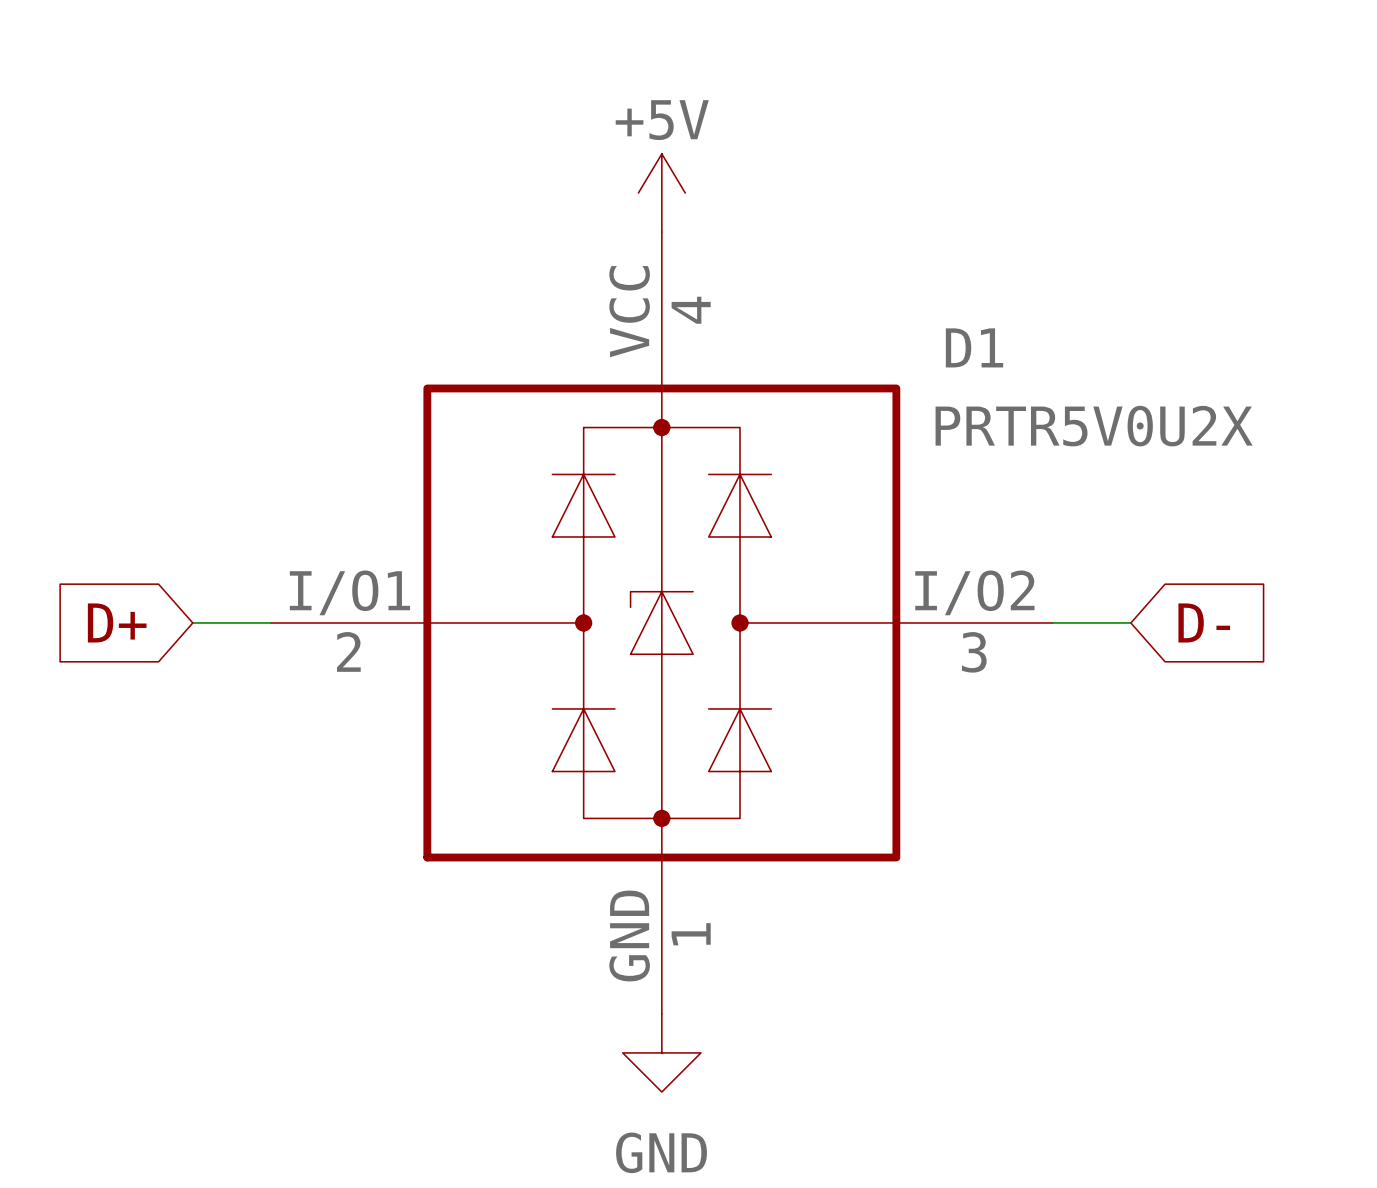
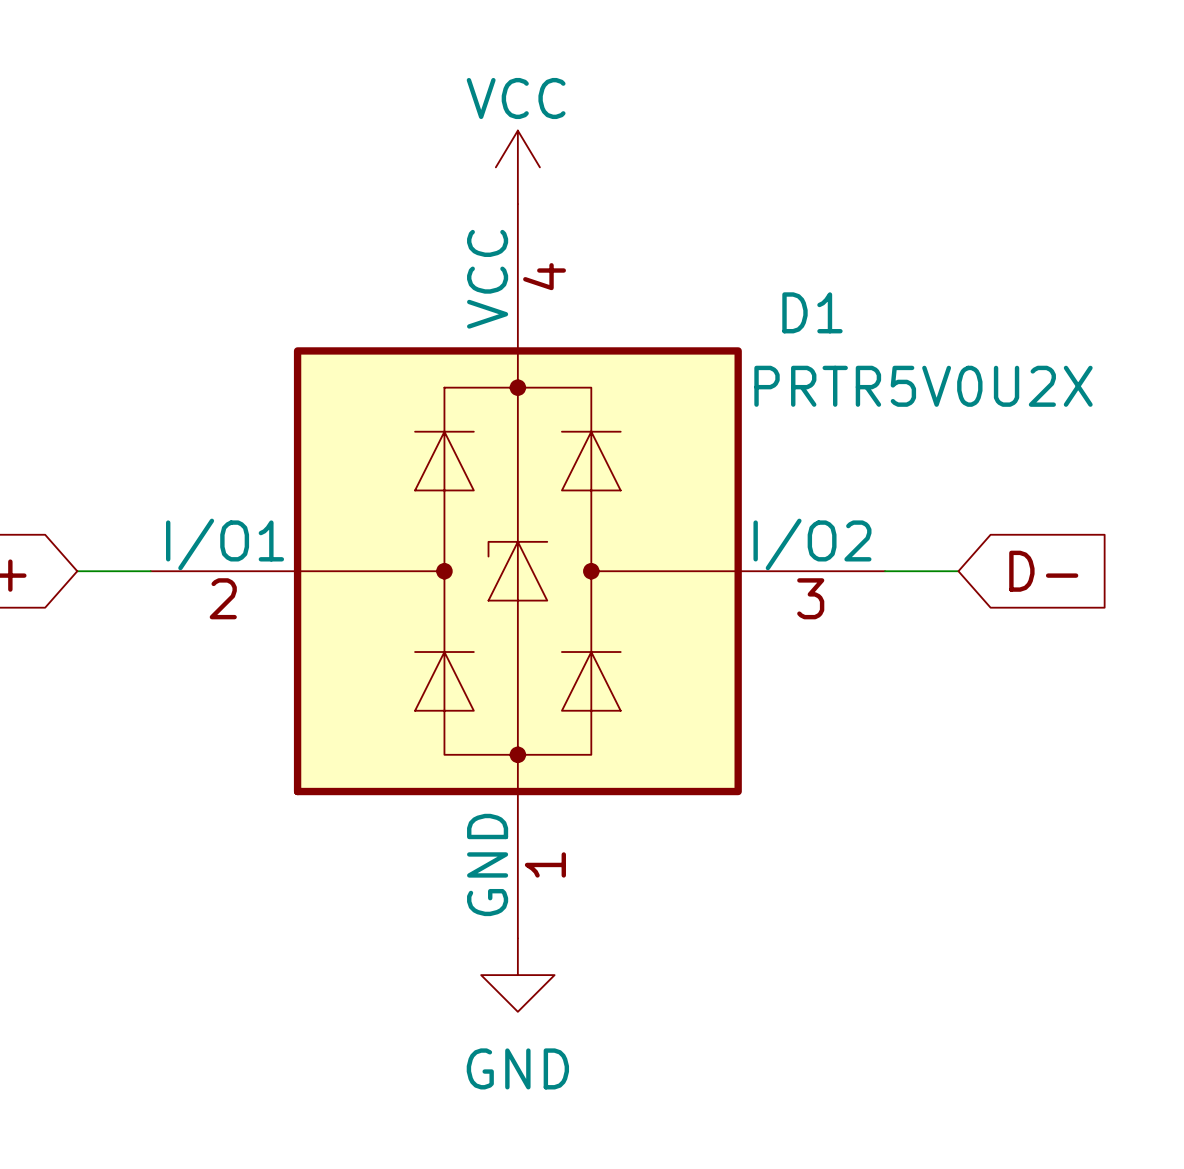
power symbol: +5V (661, 193) -> VCC (517, 167)

